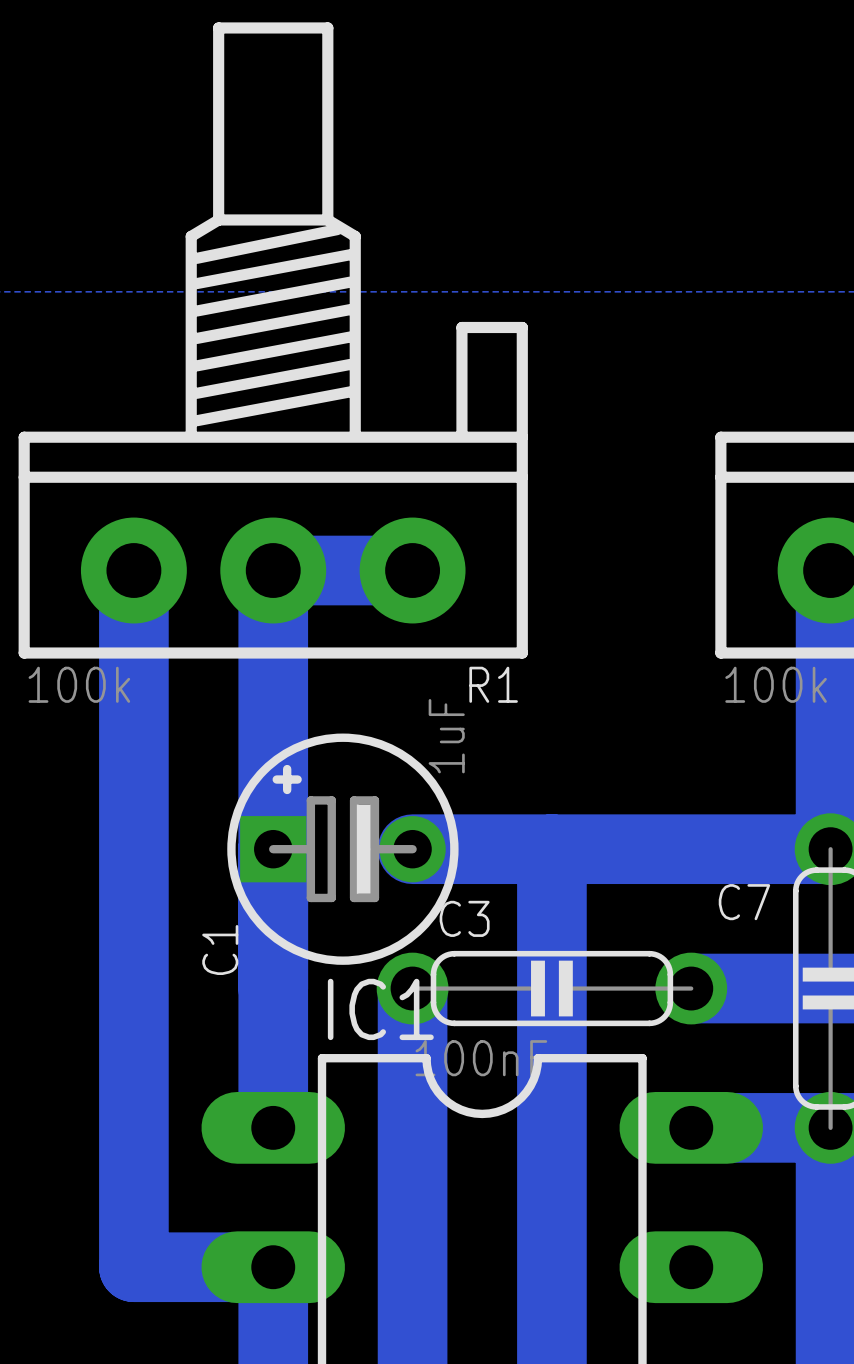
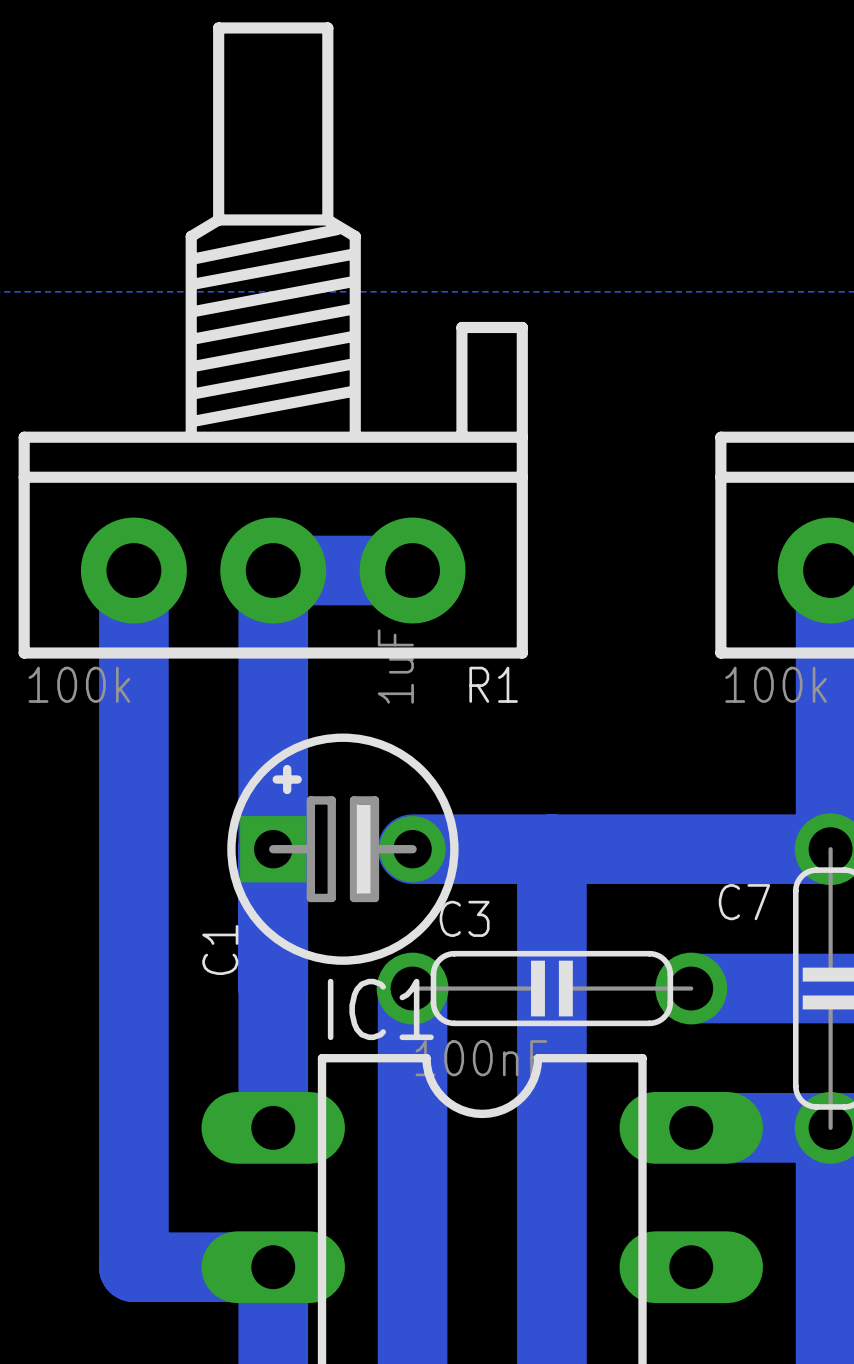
C1 value position: 1uF (446, 736) -> 1uF (395, 666)

